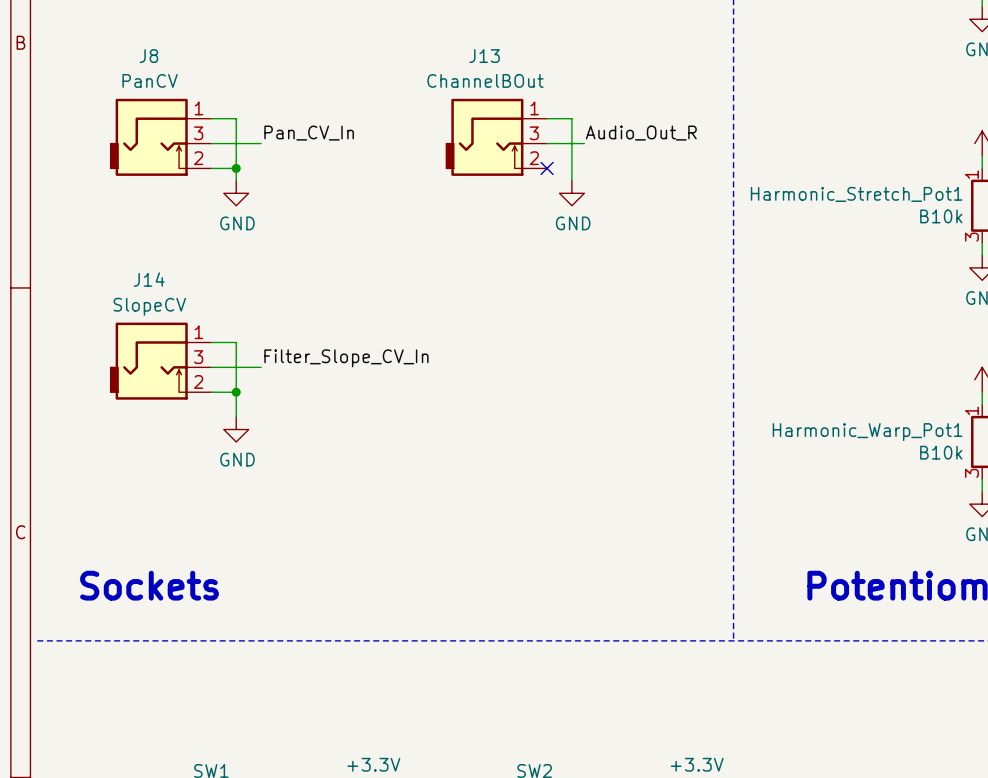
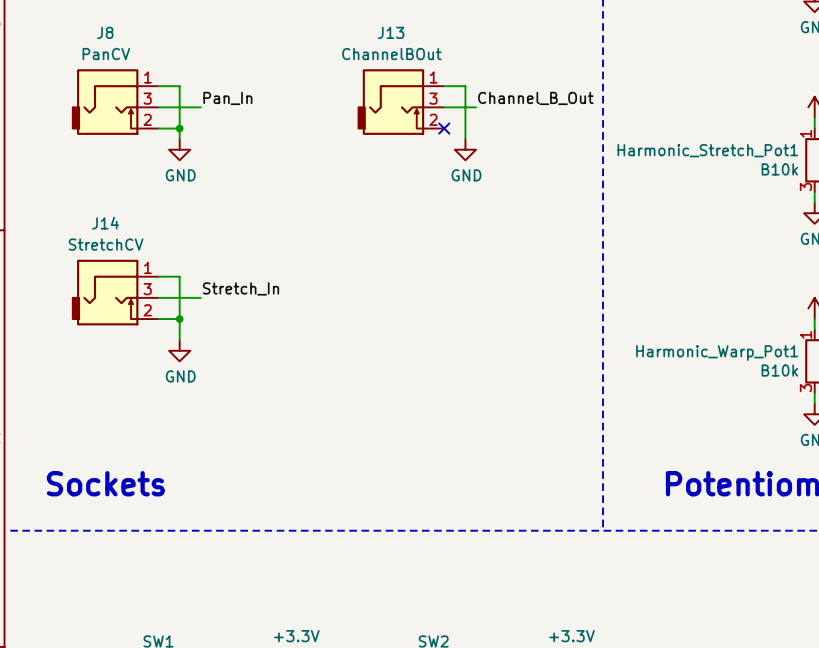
label: Pan_CV_In (309, 133) -> Pan_In (227, 98)
label: Audio_Out_R (641, 133) -> Channel_B_Out (535, 98)
J14 value: SlopeCV (149, 306) -> StretchCV (106, 244)
label: Filter_Slope_CV_In (346, 358) -> Stretch_In (240, 288)

